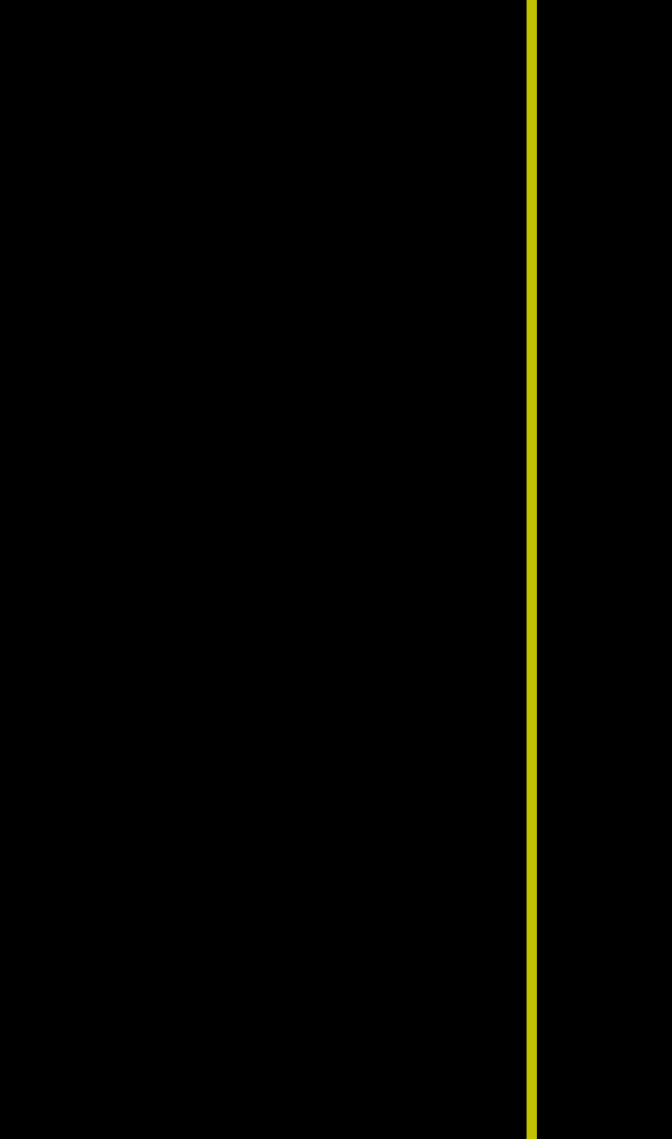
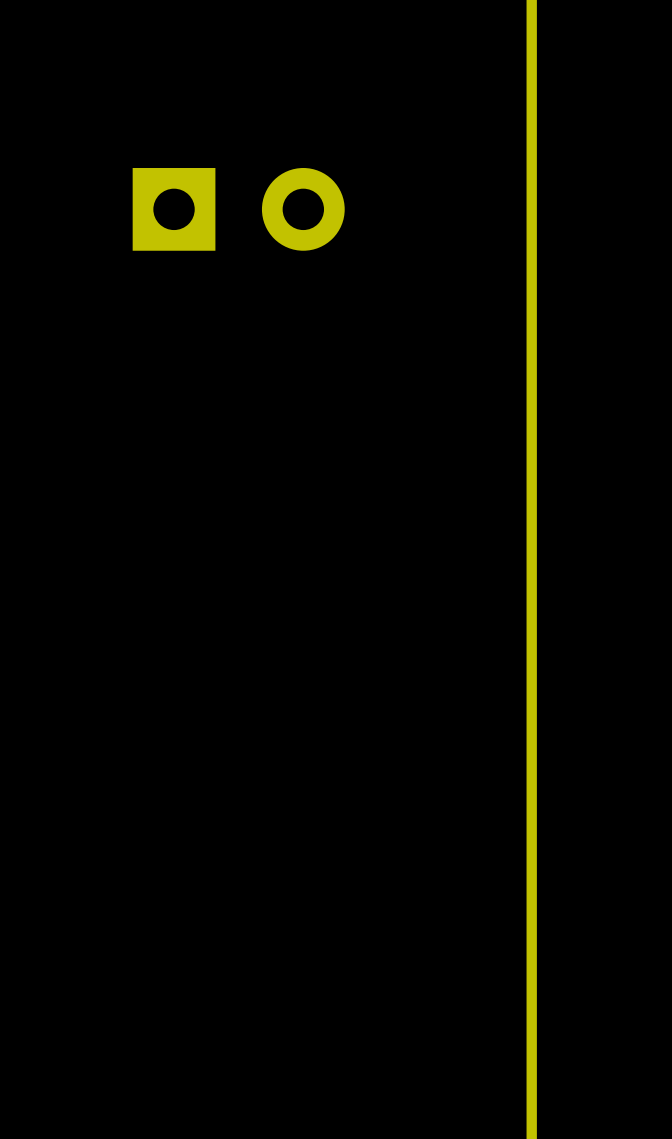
part: none -> (238, 209)

